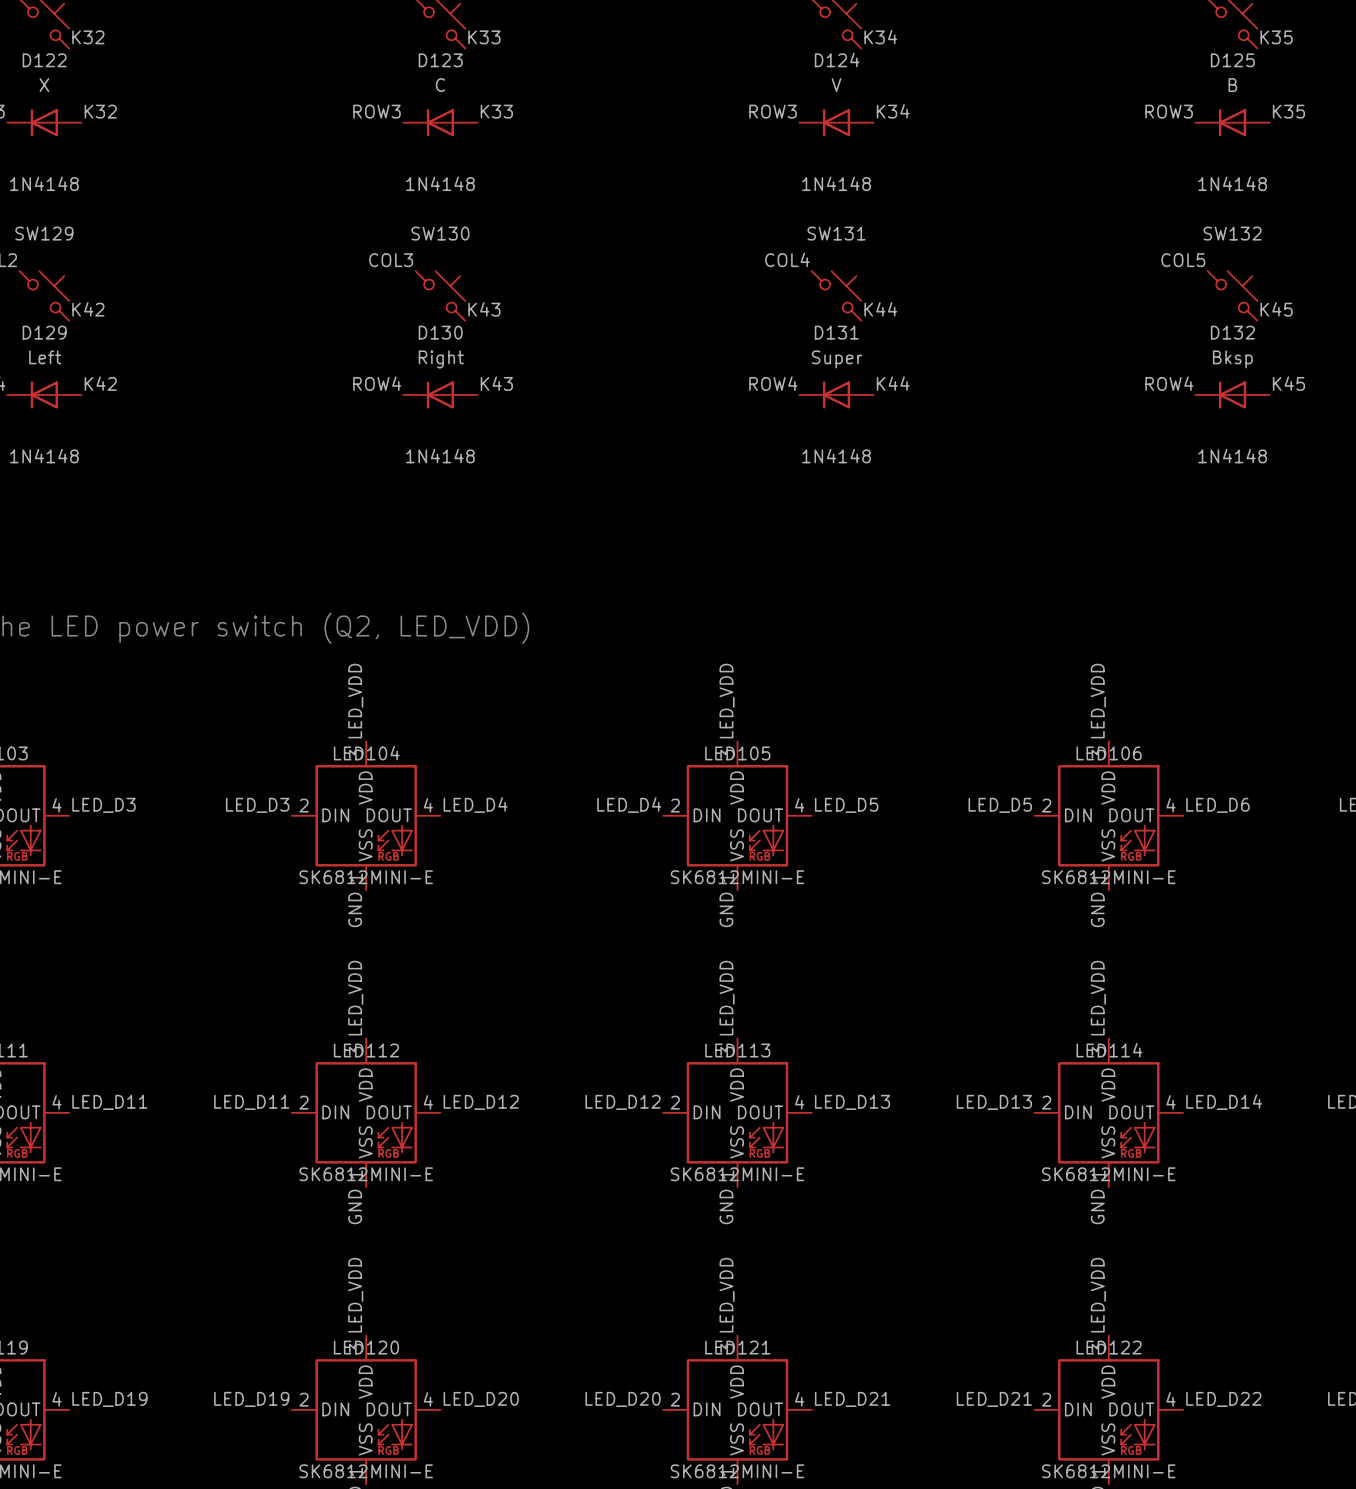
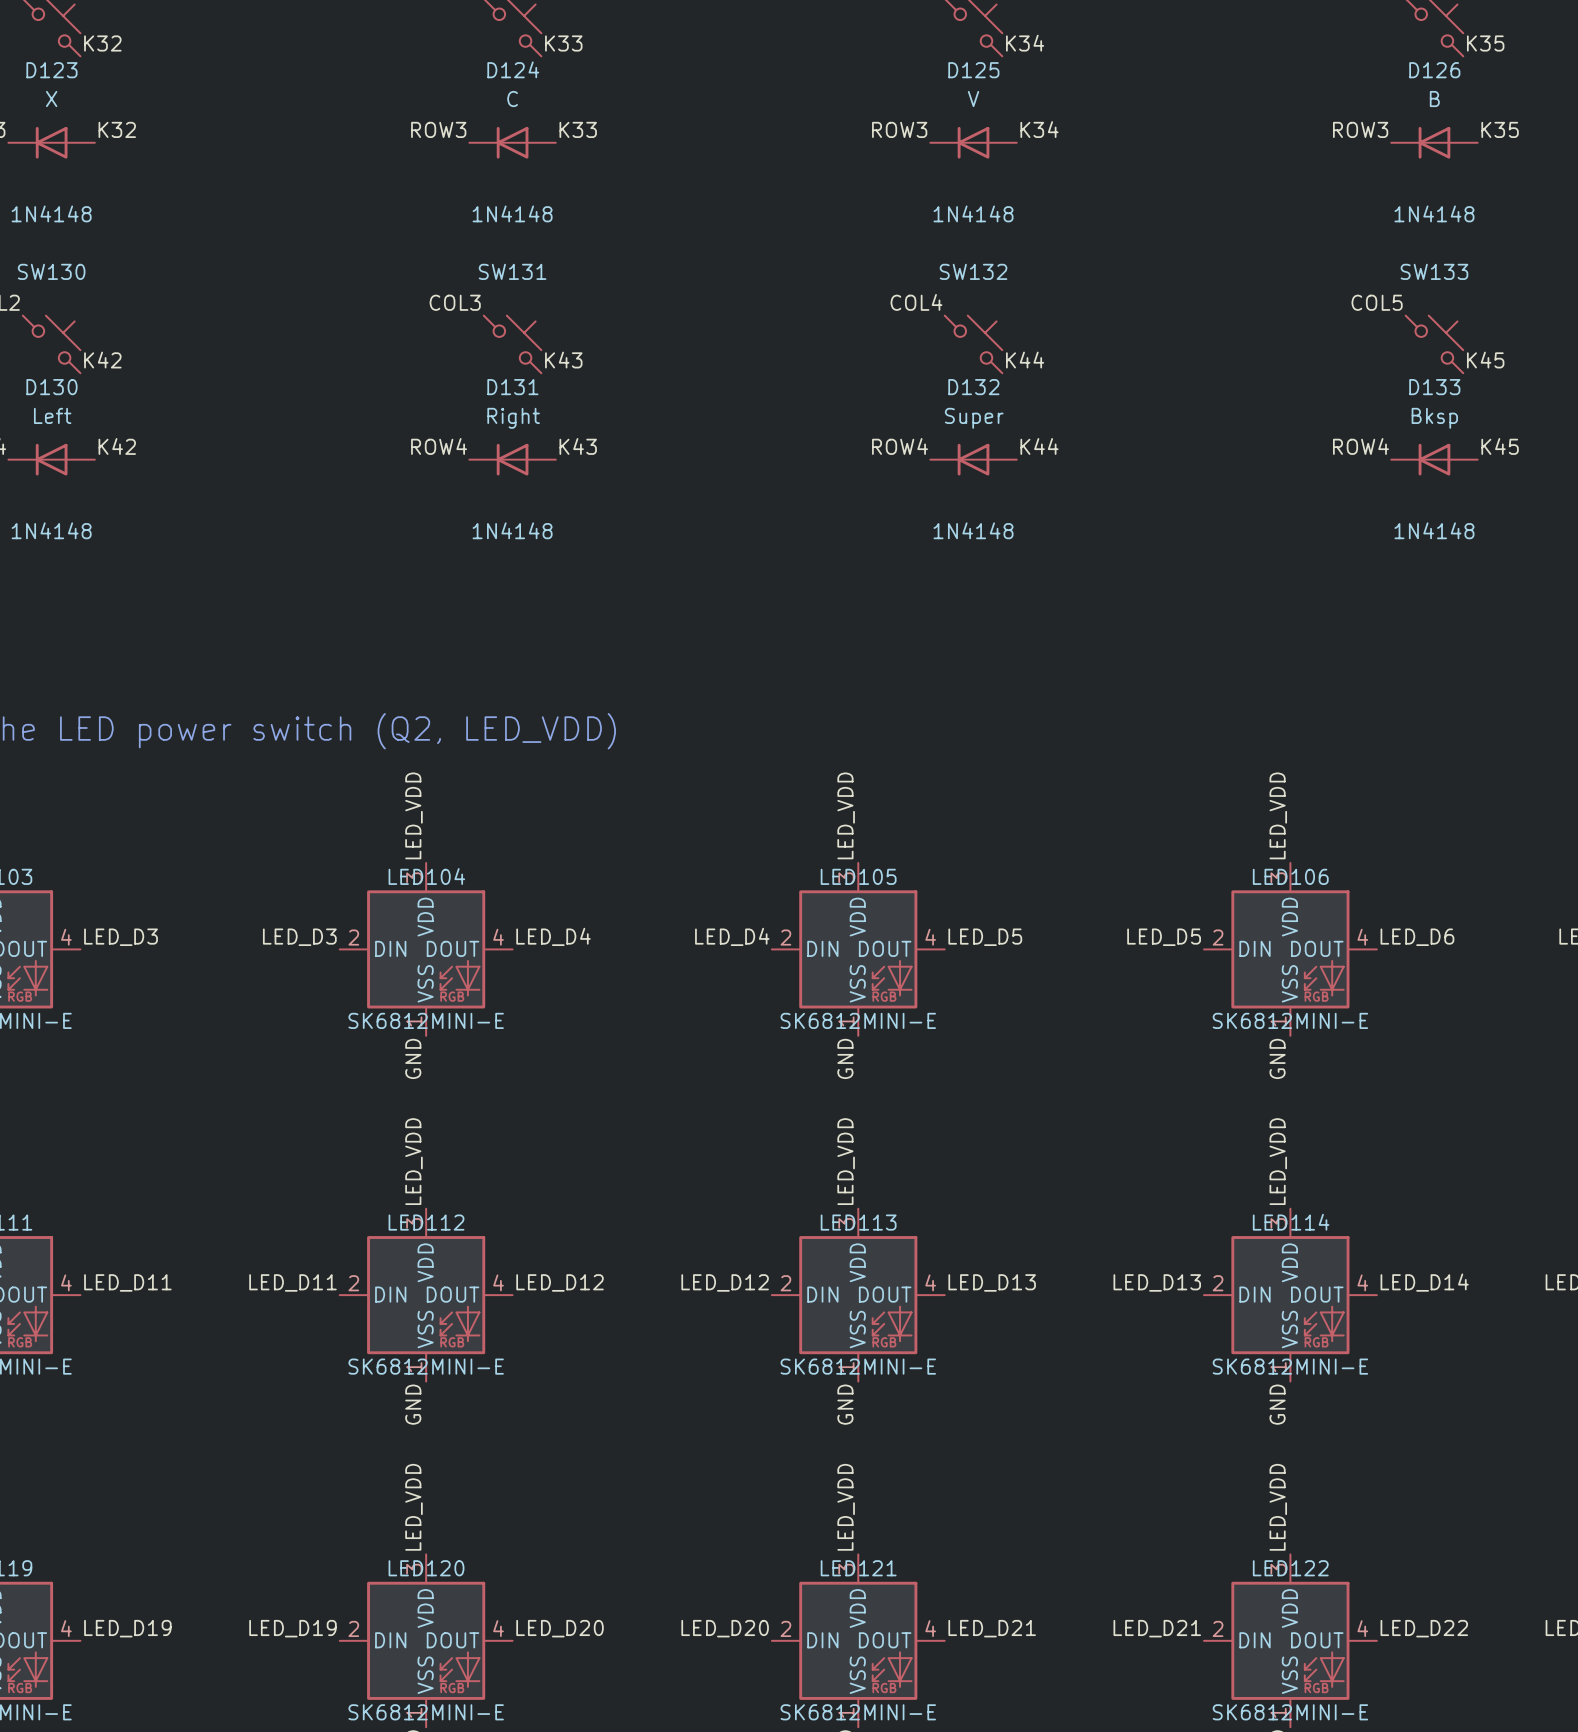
D122 name: D122 (44, 60) -> D123 (51, 70)
D123 name: D123 (440, 60) -> D124 (513, 69)
D124 name: D124 (837, 60) -> D125 (973, 70)
D125 name: D125 (1232, 60) -> D126 (1434, 70)
SW129 name: SW129 (44, 233) -> SW130 (51, 271)
SW130 name: SW130 (440, 233) -> SW131 (512, 271)
SW131 name: SW131 (836, 233) -> SW132 (973, 271)
SW132 name: SW132 (1232, 233) -> SW133 (1434, 271)
D129 name: D129 (44, 332) -> D130 (51, 387)
D130 name: D130 (440, 332) -> D131 (512, 387)
D131 name: D131 (836, 332) -> D132 (973, 387)
D132 name: D132 (1232, 332) -> D133 (1434, 387)

